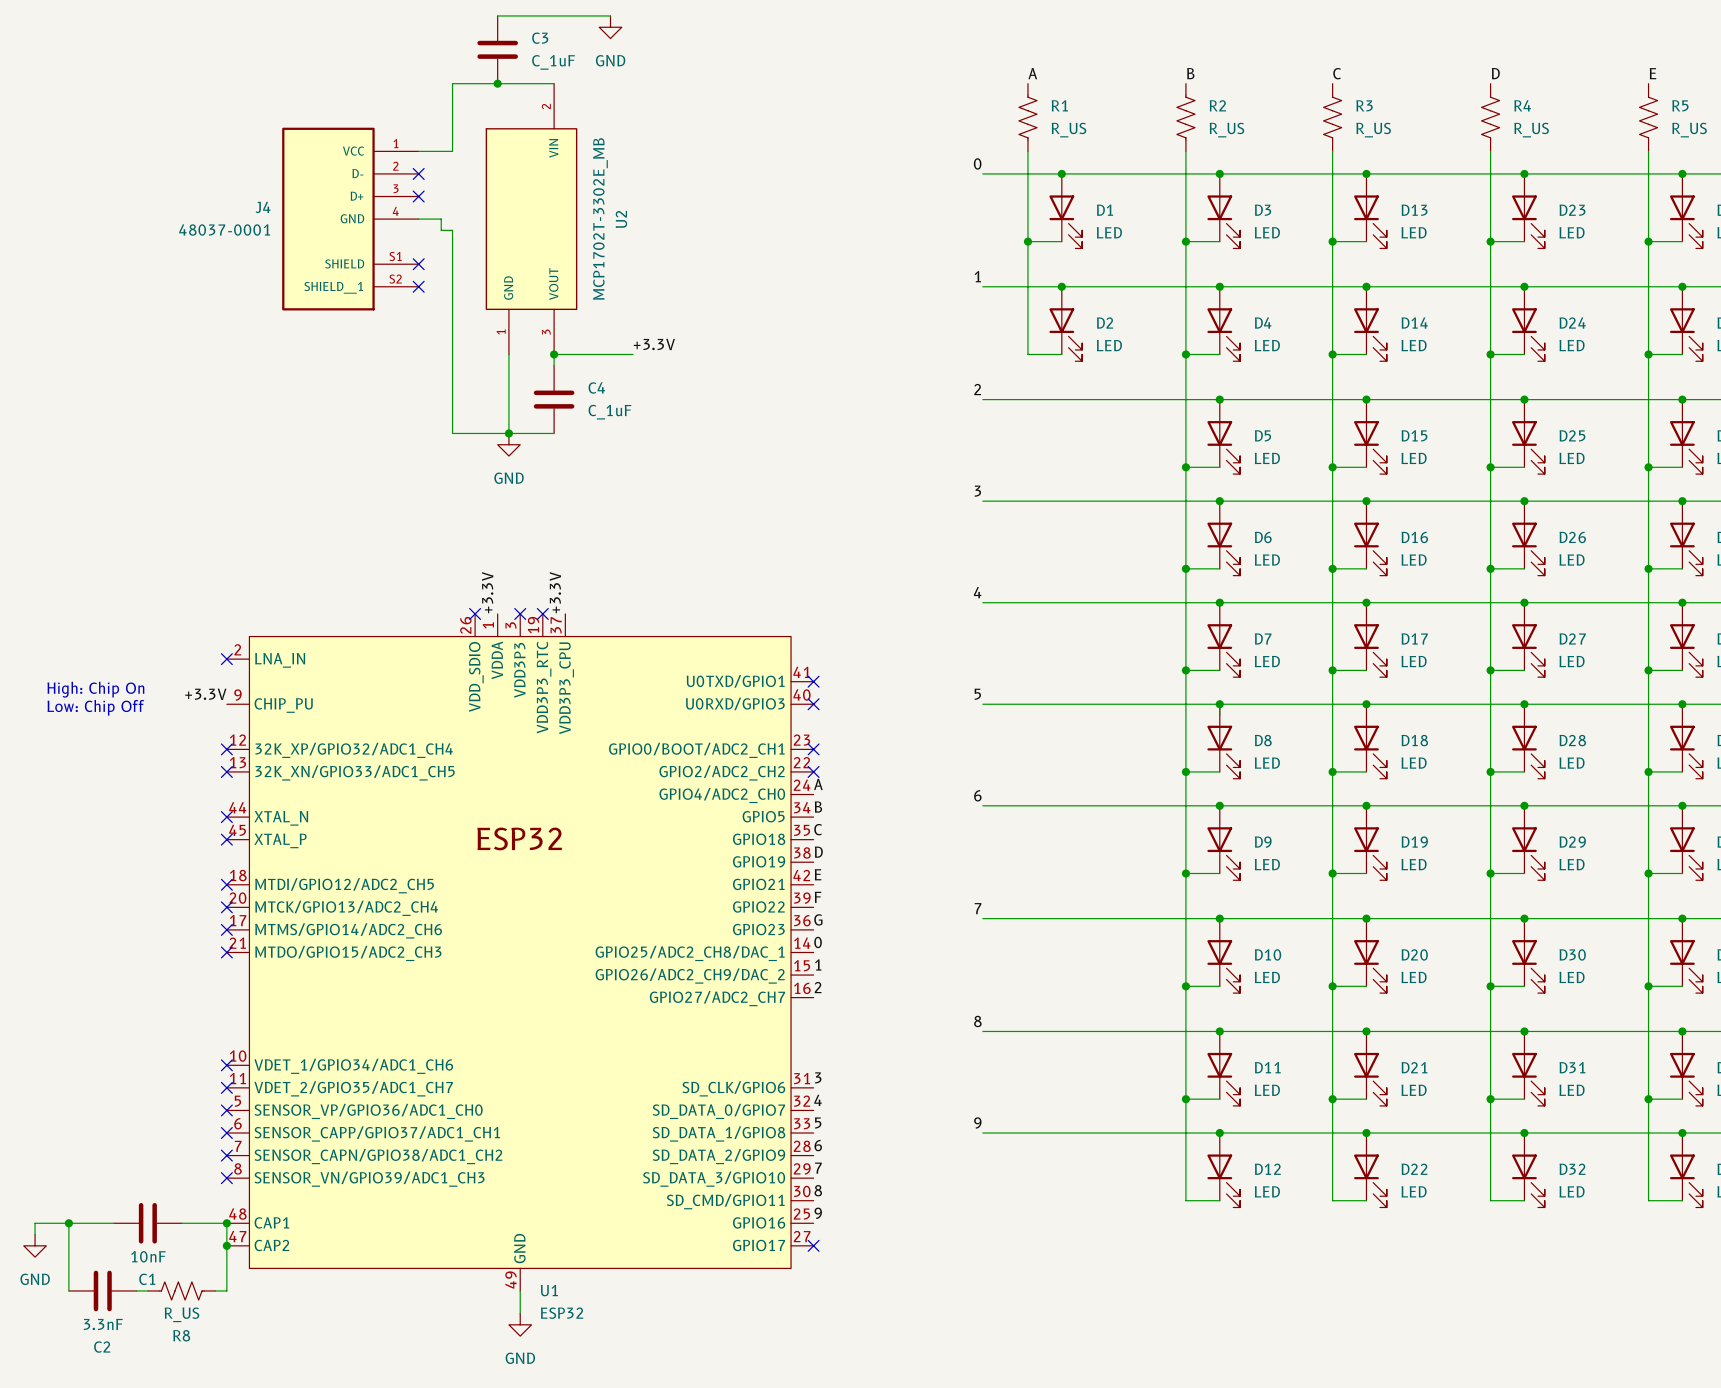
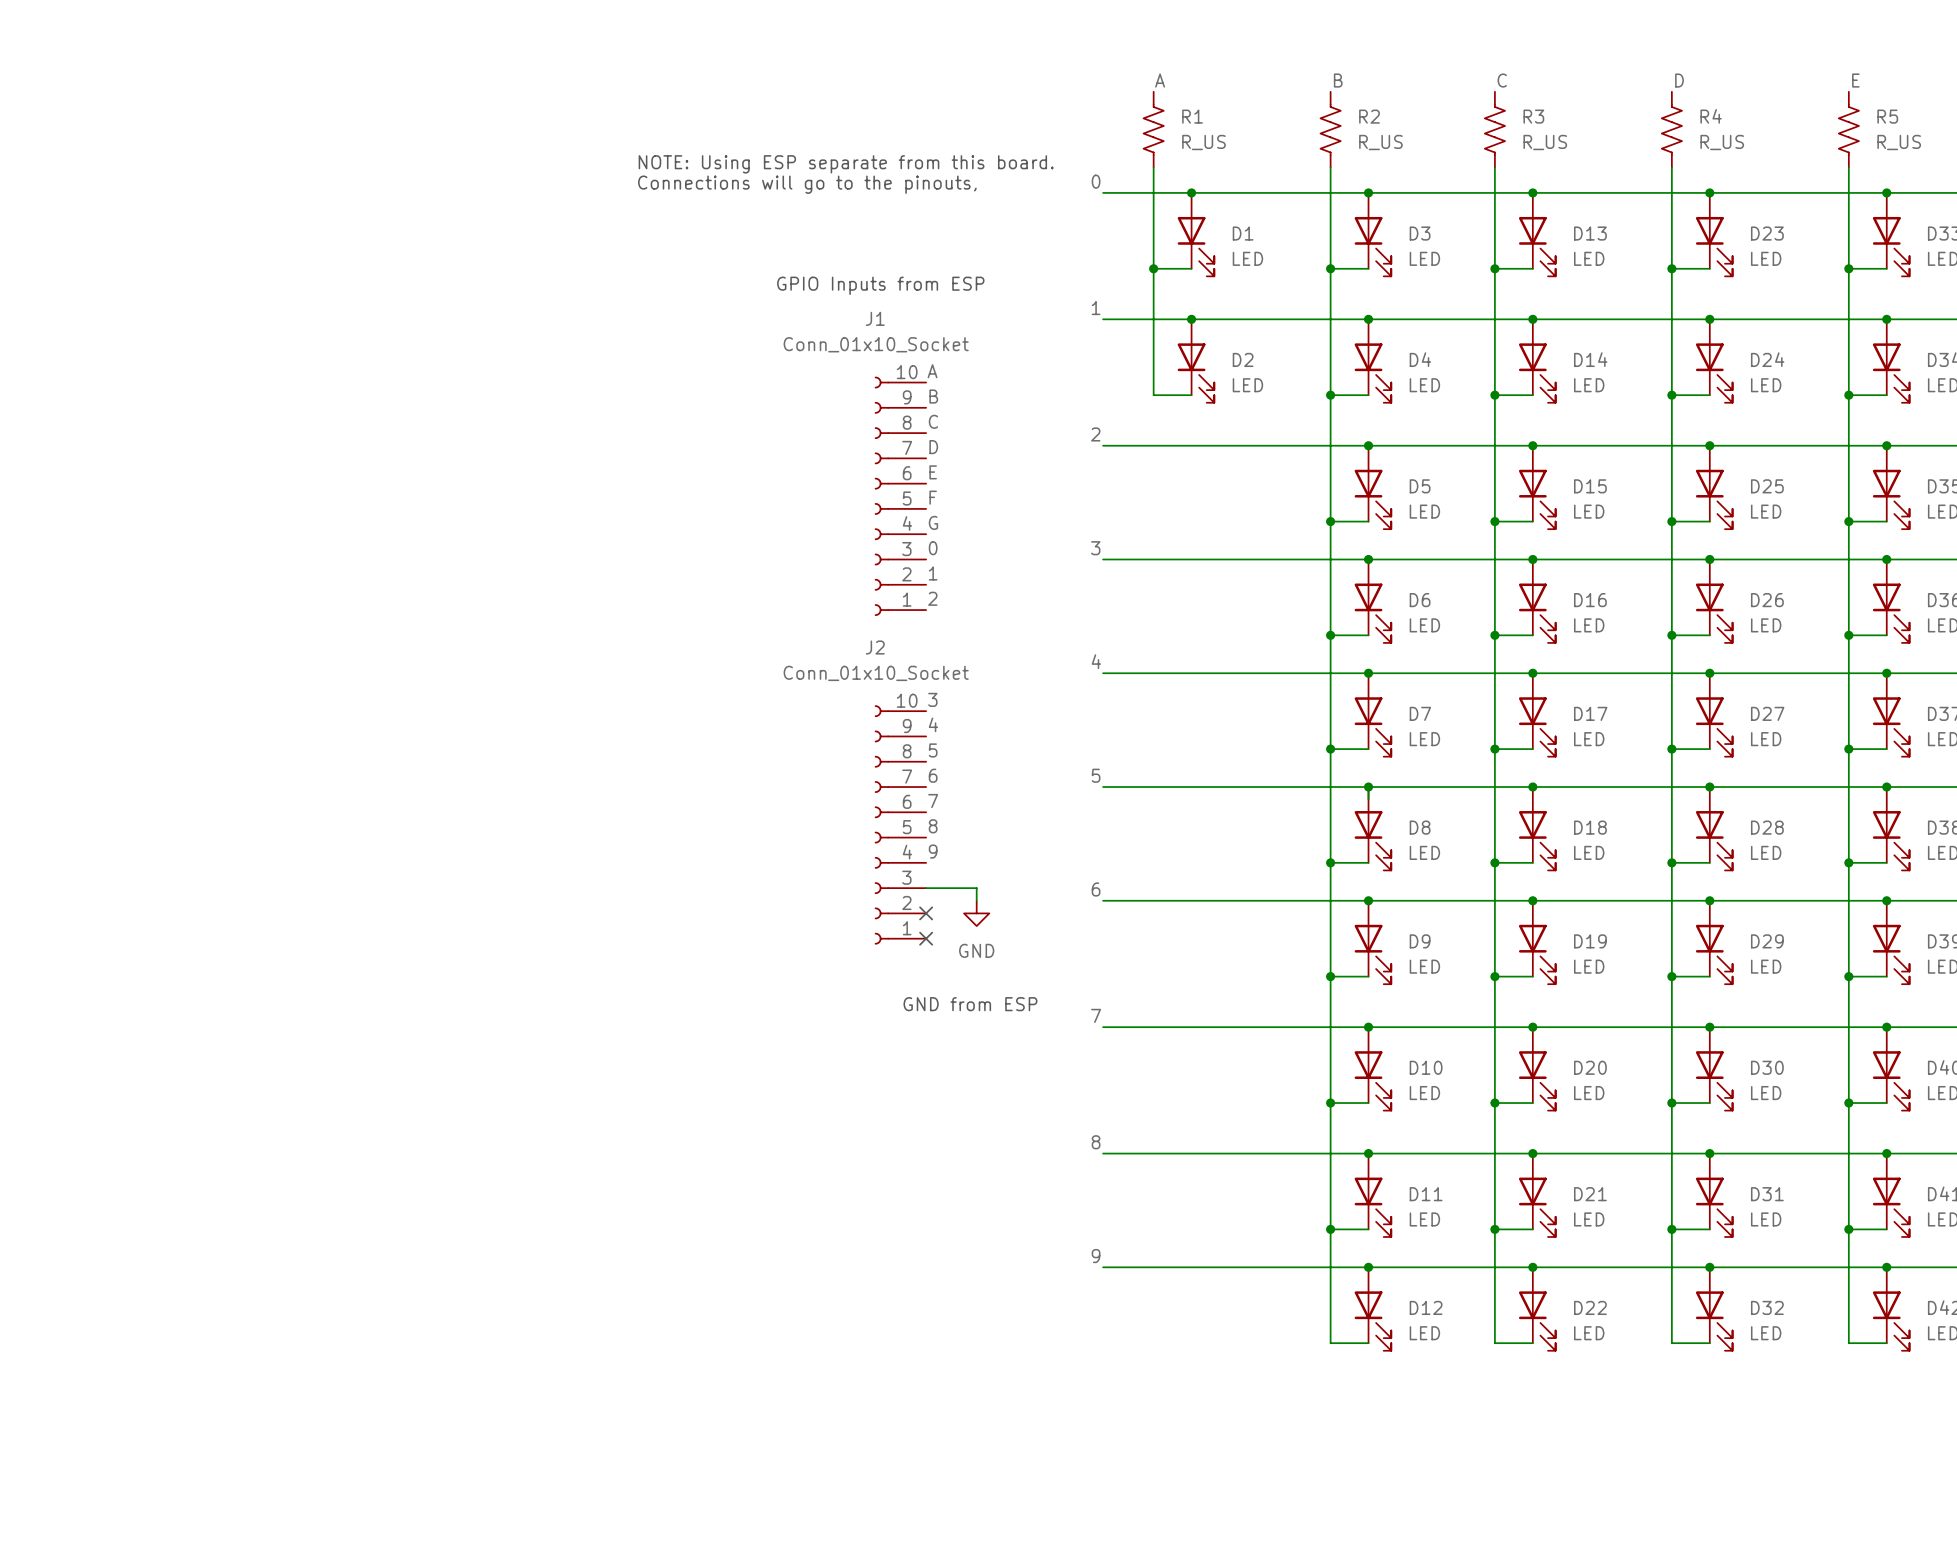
wire: (497, 15) (610, 15) -> none
power symbol: GND (610, 27) -> none
C3: C_1uF (497, 49) -> none
junction: (497, 83) -> none
wire: (554, 83) (452, 83) (452, 151) (418, 151) -> none
text: none -> NOTE: Using ESP separate from this board. (846, 164)
text: none -> Connections will go to the pinouts, (807, 184)
no-connect mark: (418, 173) -> none
no-connect mark: (418, 196) -> none
J4: 48037-0001 (350, 219) -> none
wire: (418, 219) (441, 219) (441, 230) (452, 230) (452, 433) (554, 433) -> none
U2: MCP1702T-3302E_MB (531, 219) -> none
text: none -> GPIO Inputs from ESP (880, 285)
no-connect mark: (418, 264) -> none
no-connect mark: (418, 286) -> none
label: none -> A (932, 371)
label: +3.3V (654, 344) -> none
wire: (508, 354) (508, 433) -> none
junction: (554, 354) -> none
wire: (633, 354) (554, 354) (554, 365) -> none
label: none -> B (933, 396)
label: none -> C (933, 421)
C4: C_1uF (554, 399) -> none
label: none -> D (933, 447)
label: none -> E (933, 472)
junction: (508, 433) -> none
power symbol: GND (508, 444) -> none
J1: none -> Conn_01x10_Socket (900, 496)
label: none -> F (933, 497)
label: none -> G (933, 522)
label: none -> 0 (933, 548)
label: none -> 1 (933, 573)
label: none -> 2 (932, 598)
label: +3.3V (487, 592) -> none
label: +3.3V (555, 592) -> none
no-connect mark: (475, 613) -> none
no-connect mark: (520, 613) -> none
no-connect mark: (542, 613) -> none
label: none -> 3 (932, 699)
label: none -> 4 (933, 724)
no-connect mark: (226, 659) -> none
label: none -> 5 (933, 750)
no-connect mark: (813, 681) -> none
text: High: Chip On (95, 689) -> none
label: +3.3V (205, 694) -> none
label: none -> 6 (933, 775)
no-connect mark: (813, 704) -> none
text: Low: Chip Off (95, 707) -> none
label: none -> 7 (933, 801)
J2: none -> Conn_01x10_Socket (900, 824)
label: none -> 8 (933, 826)
no-connect mark: (226, 749) -> none
no-connect mark: (813, 749) -> none
label: none -> 9 (933, 851)
no-connect mark: (226, 771) -> none
no-connect mark: (813, 771) -> none
label: A (818, 784) -> none
wire: none -> (926, 888) (976, 888) (976, 900)
label: B (818, 807) -> none
no-connect mark: (226, 817) -> none
no-connect mark: none -> (926, 913)
power symbol: none -> GND (976, 913)
label: C (818, 829) -> none
no-connect mark: (226, 839) -> none
no-connect mark: none -> (926, 938)
label: D (818, 852) -> none
label: E (818, 874) -> none
no-connect mark: (226, 884) -> none
label: F (818, 897) -> none
text: none -> GND from ESP (970, 1004)
no-connect mark: (226, 907) -> none
label: G (818, 919) -> none
no-connect mark: (226, 929) -> none
label: 0 (818, 942) -> none
no-connect mark: (226, 952) -> none
U1: ESP32 (520, 952) -> none
label: 1 (818, 964) -> none
label: 2 (818, 987) -> none
no-connect mark: (226, 1065) -> none
label: 3 (818, 1077) -> none
no-connect mark: (226, 1087) -> none
label: 4 (818, 1100) -> none
no-connect mark: (226, 1110) -> none
label: 5 (818, 1123) -> none
no-connect mark: (226, 1133) -> none
label: 6 (818, 1145) -> none
no-connect mark: (226, 1155) -> none
label: 7 (818, 1168) -> none
no-connect mark: (226, 1178) -> none
label: 8 (818, 1190) -> none
label: 9 (818, 1213) -> none
wire: (68, 1223) (68, 1290) -> none
junction: (68, 1223) -> none
wire: (114, 1223) (35, 1223) (35, 1234) -> none
C1: 10nF (147, 1223) -> none
wire: (181, 1223) (226, 1223) (226, 1290) (215, 1290) -> none
junction: (226, 1223) -> none
power symbol: GND (35, 1245) -> none
junction: (226, 1245) -> none
no-connect mark: (813, 1245) -> none
C2: 3.3nF (102, 1290) -> none
wire: (136, 1290) (147, 1290) -> none
R8: R_US (181, 1290) -> none
wire: (520, 1290) (520, 1313) -> none
power symbol: GND (520, 1324) -> none

